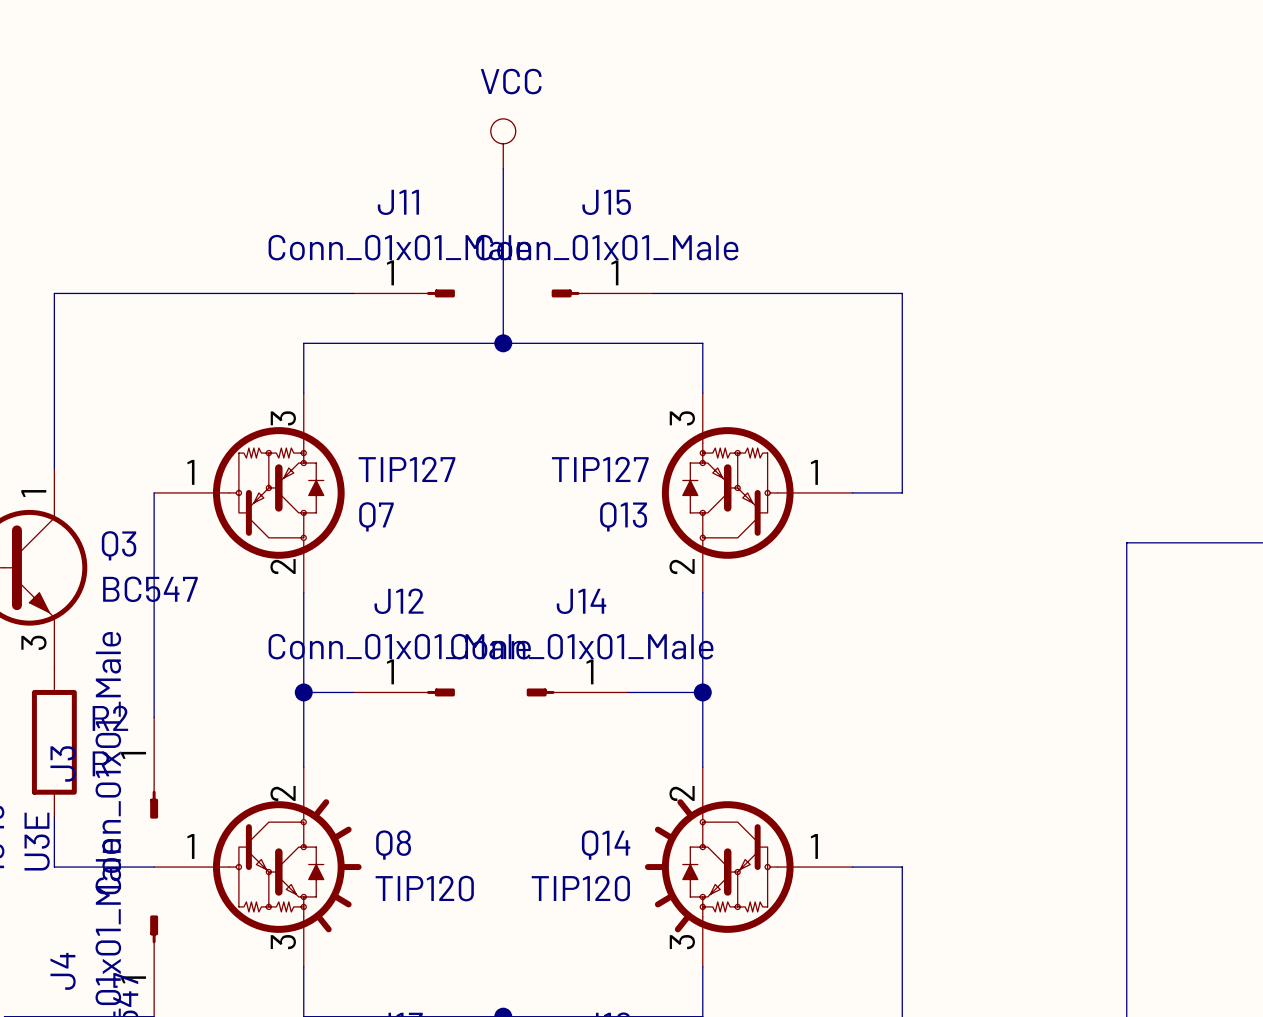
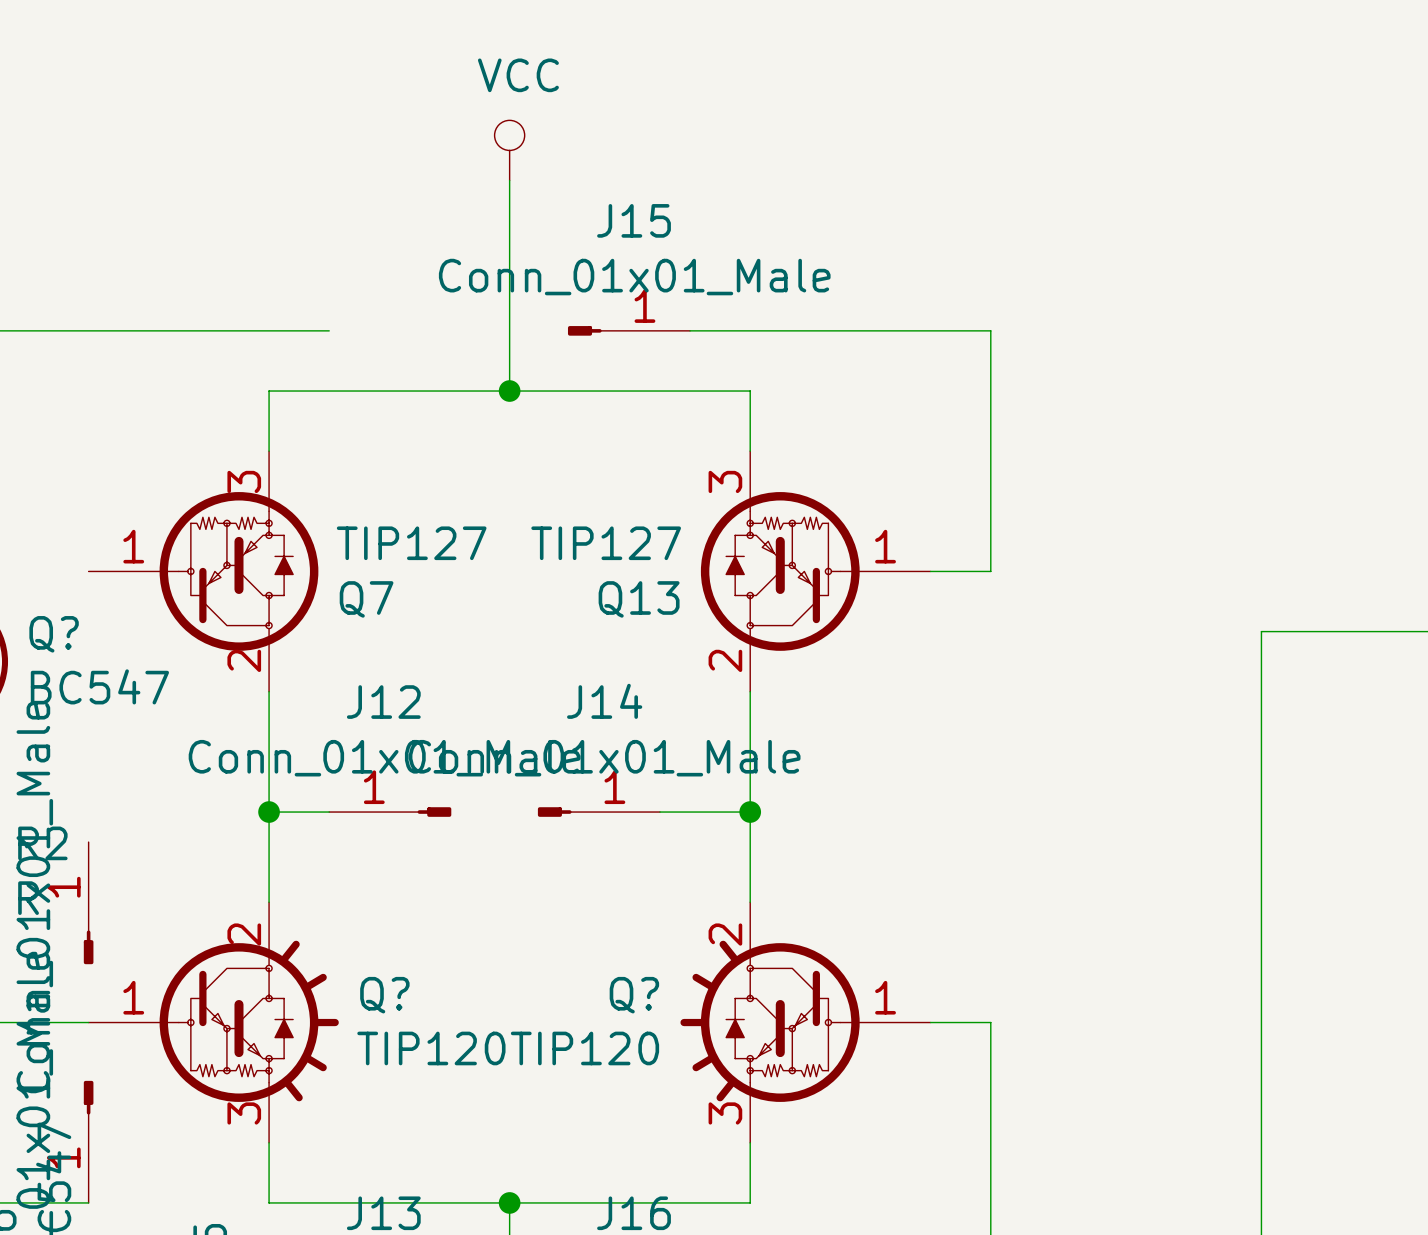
J11: Conn_01x01_Male (404, 293) -> none
wire: (154, 492) (154, 717) -> none
Q3 name: Q3 (119, 545) -> Q? (54, 634)
Q8 name: Q8 (393, 845) -> Q? (384, 995)
Q14 name: Q14 (606, 845) -> Q? (634, 995)

